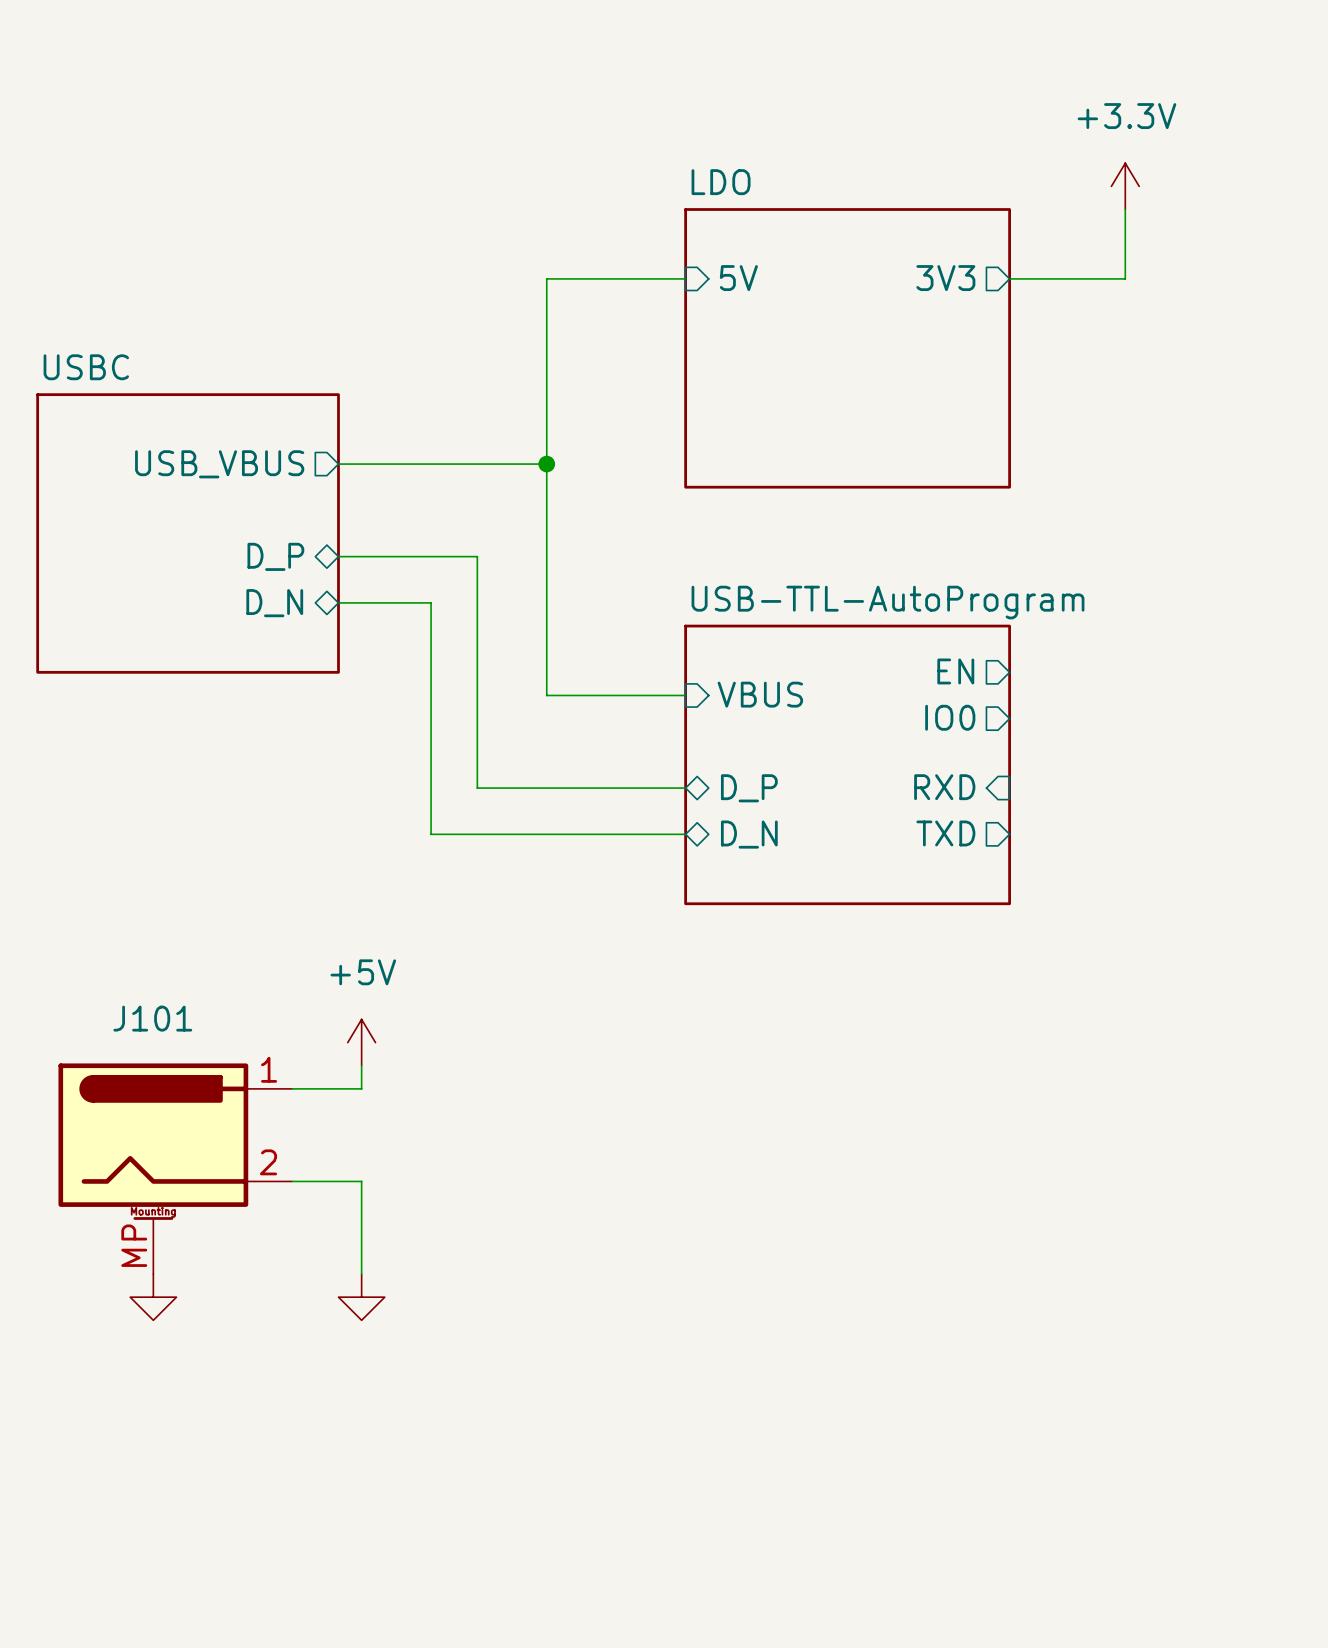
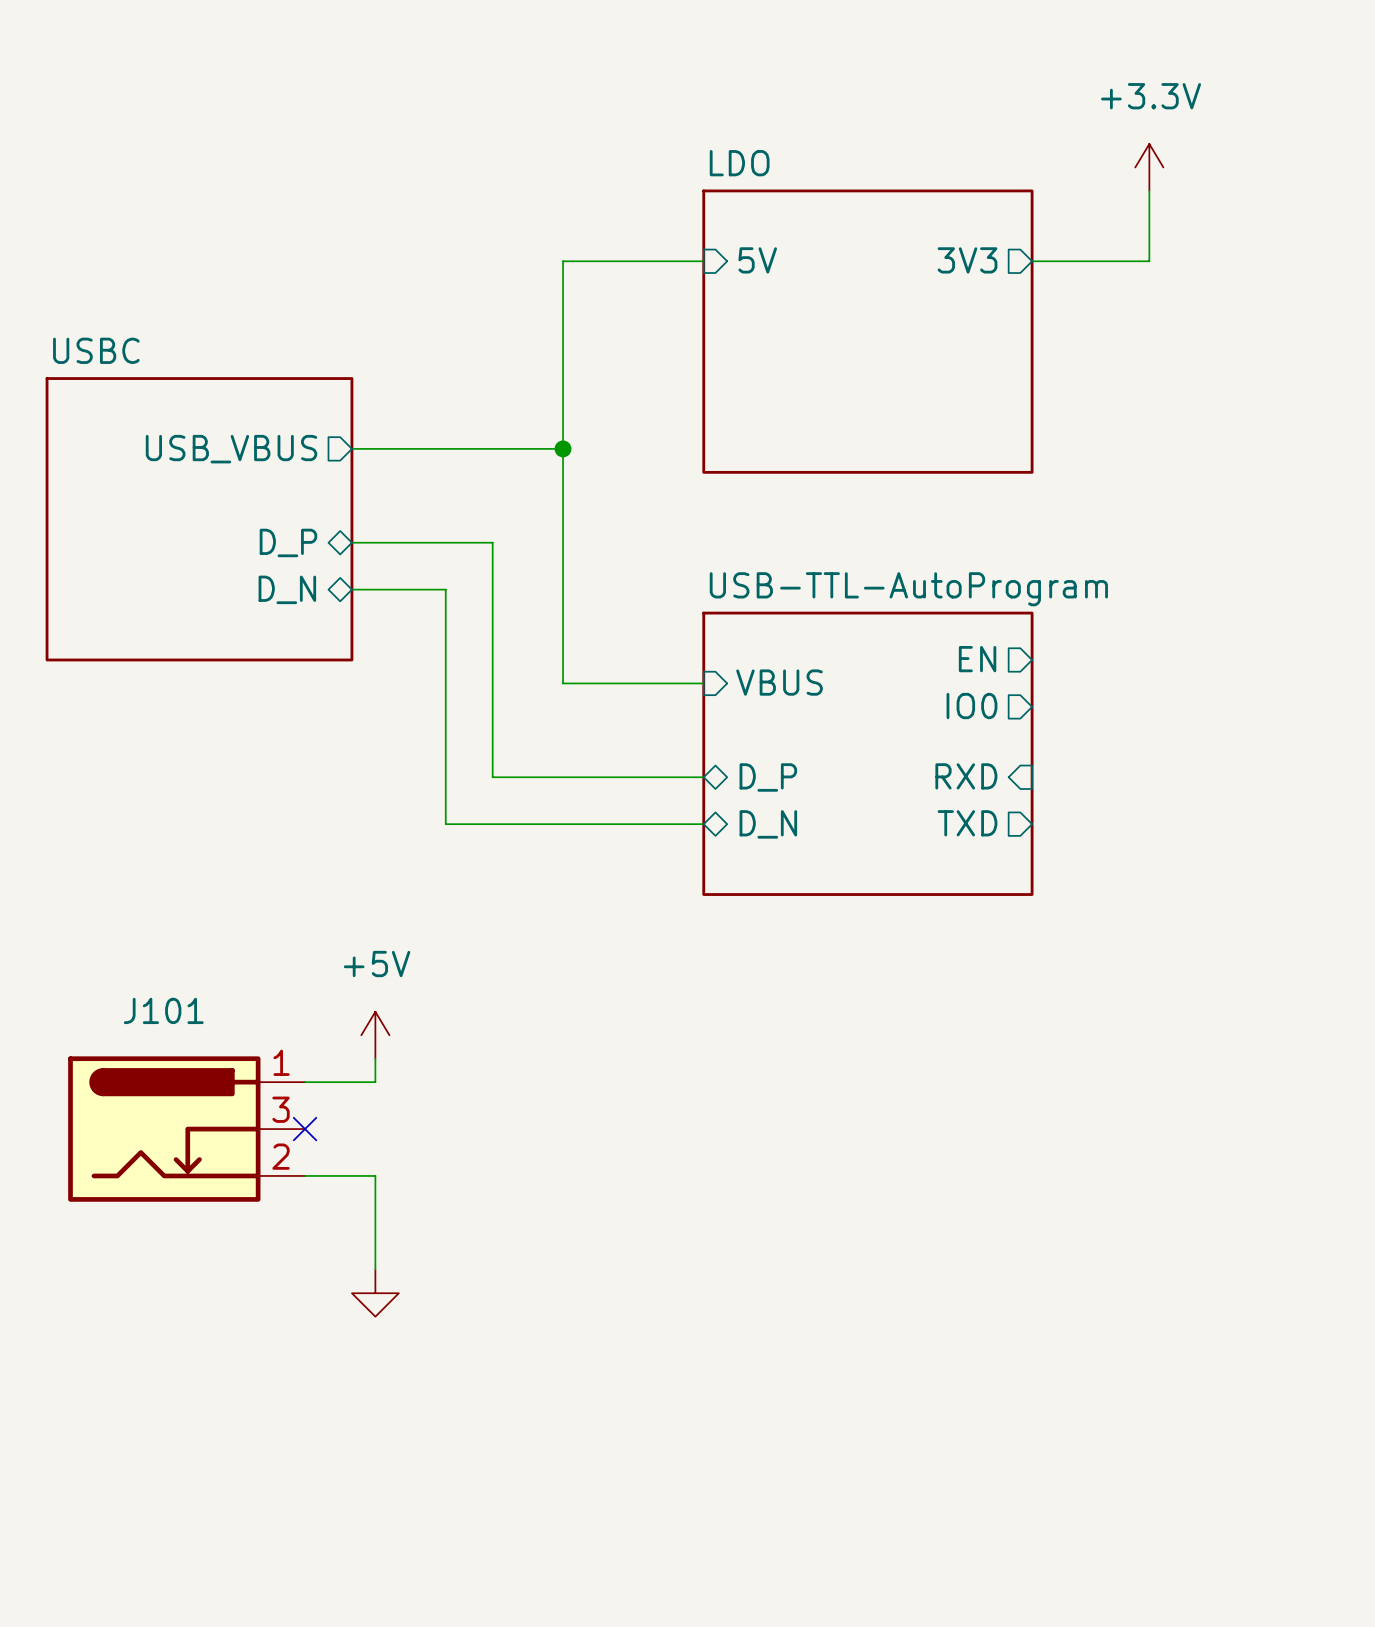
J101 symbol: [58, 1063, 293, 1275] -> [68, 1056, 306, 1202]
no-connect mark: none -> (305, 1129)
power symbol: (153, 1297) -> none

